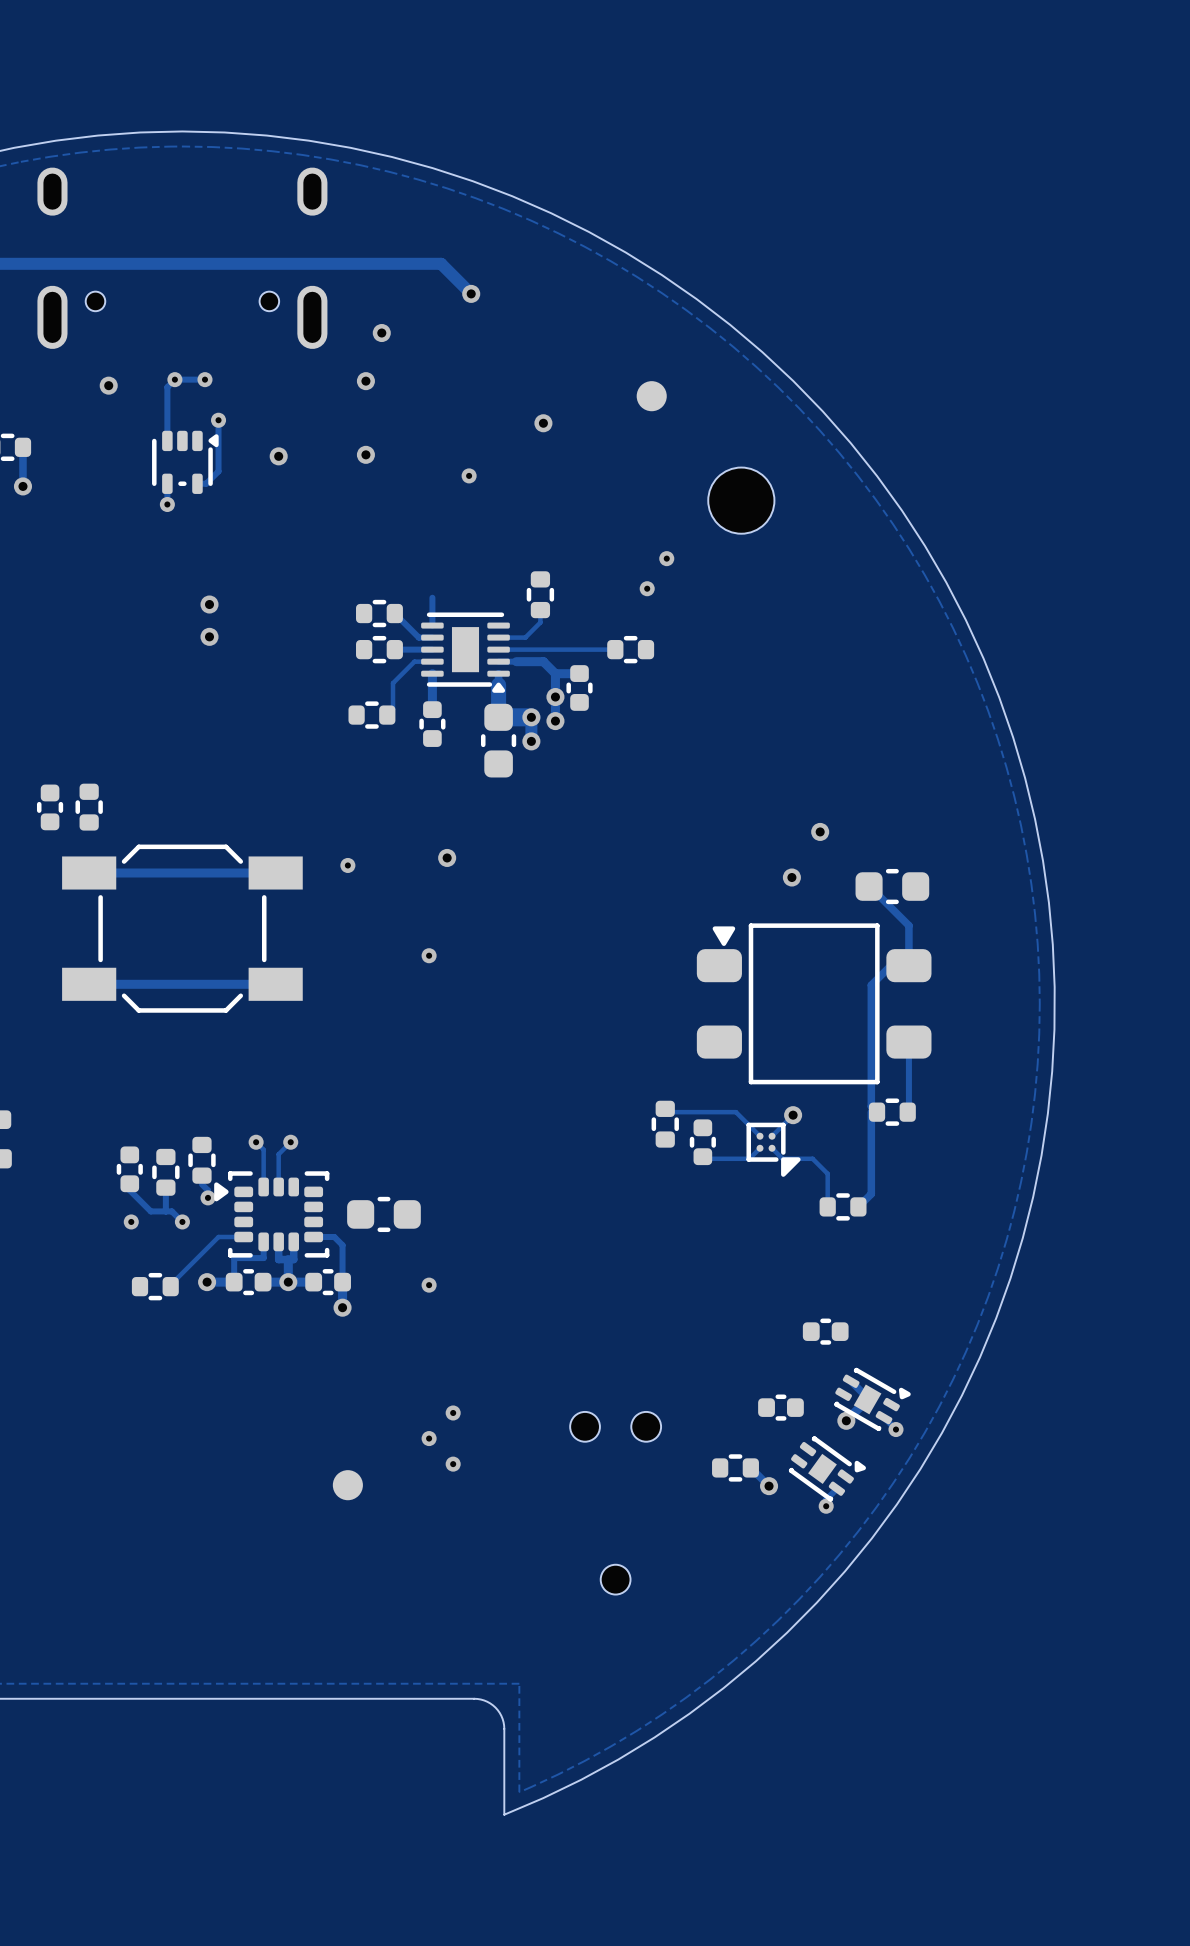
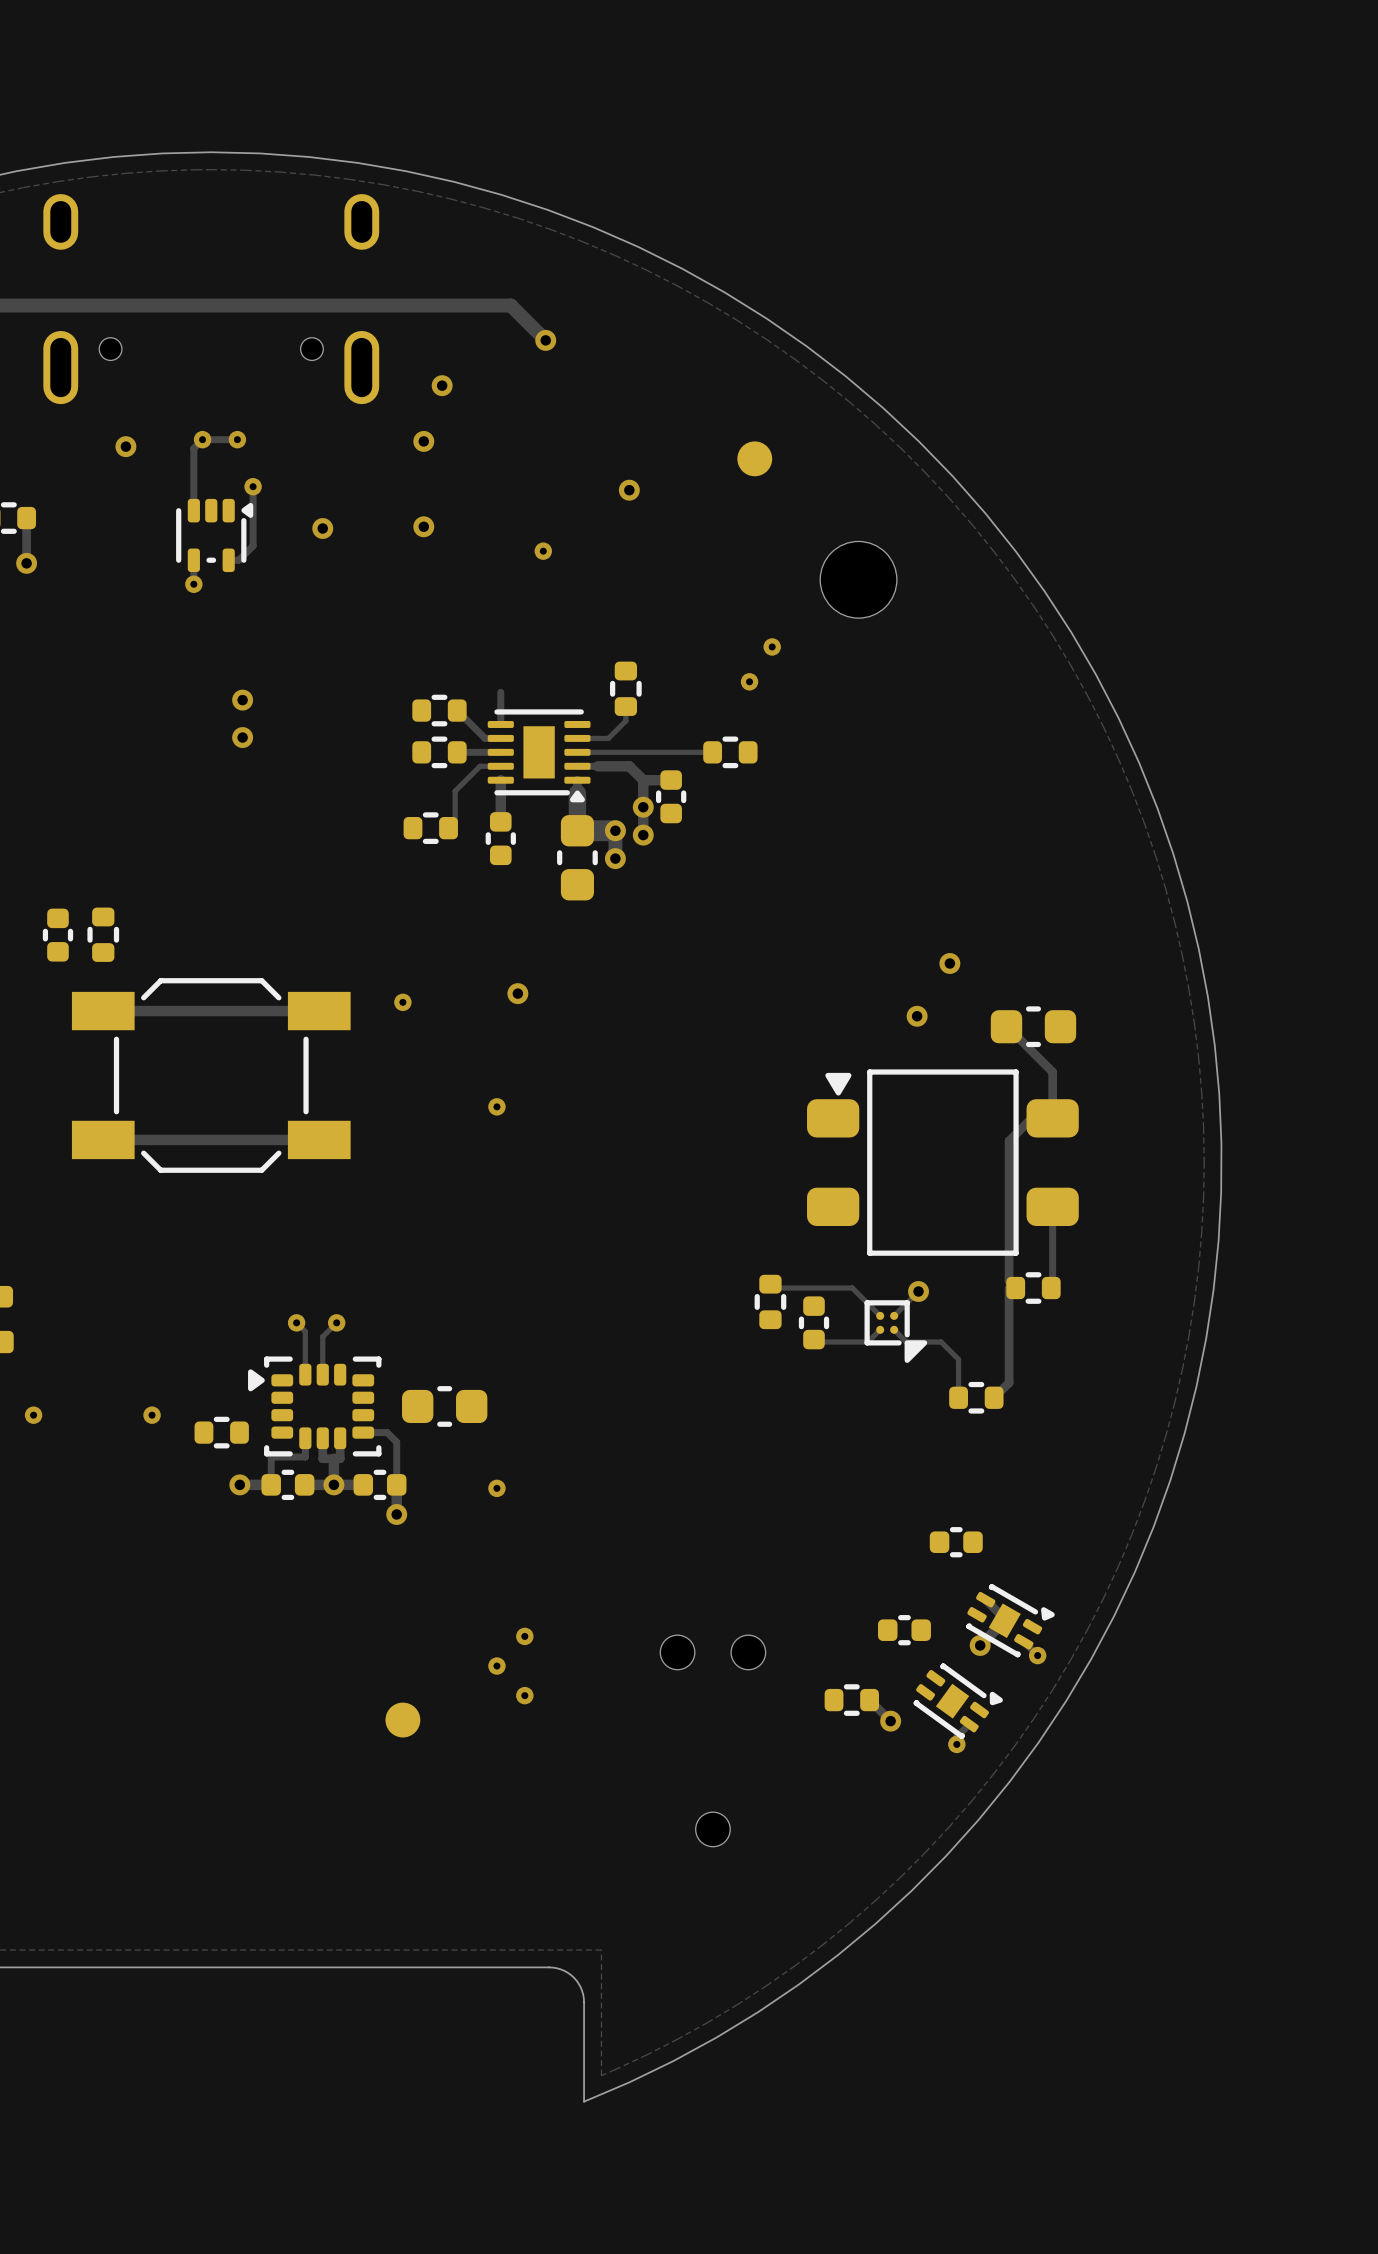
part: (201, 1160) -> none
part: (129, 1169) -> none
part: (165, 1172) -> none
track: (129, 1183) (129, 1190) (150, 1211) (171, 1211) (182, 1221) -> none
track: (201, 1184) (207, 1190) (207, 1197) -> none
track: (165, 1187) (165, 1211) -> none
via: (207, 1197) -> none
via: none -> (33, 1415)
via: (182, 1221) -> none
part: none -> (221, 1432)
track: (243, 1237) (218, 1237) (170, 1286) -> none
part: (155, 1286) -> none

